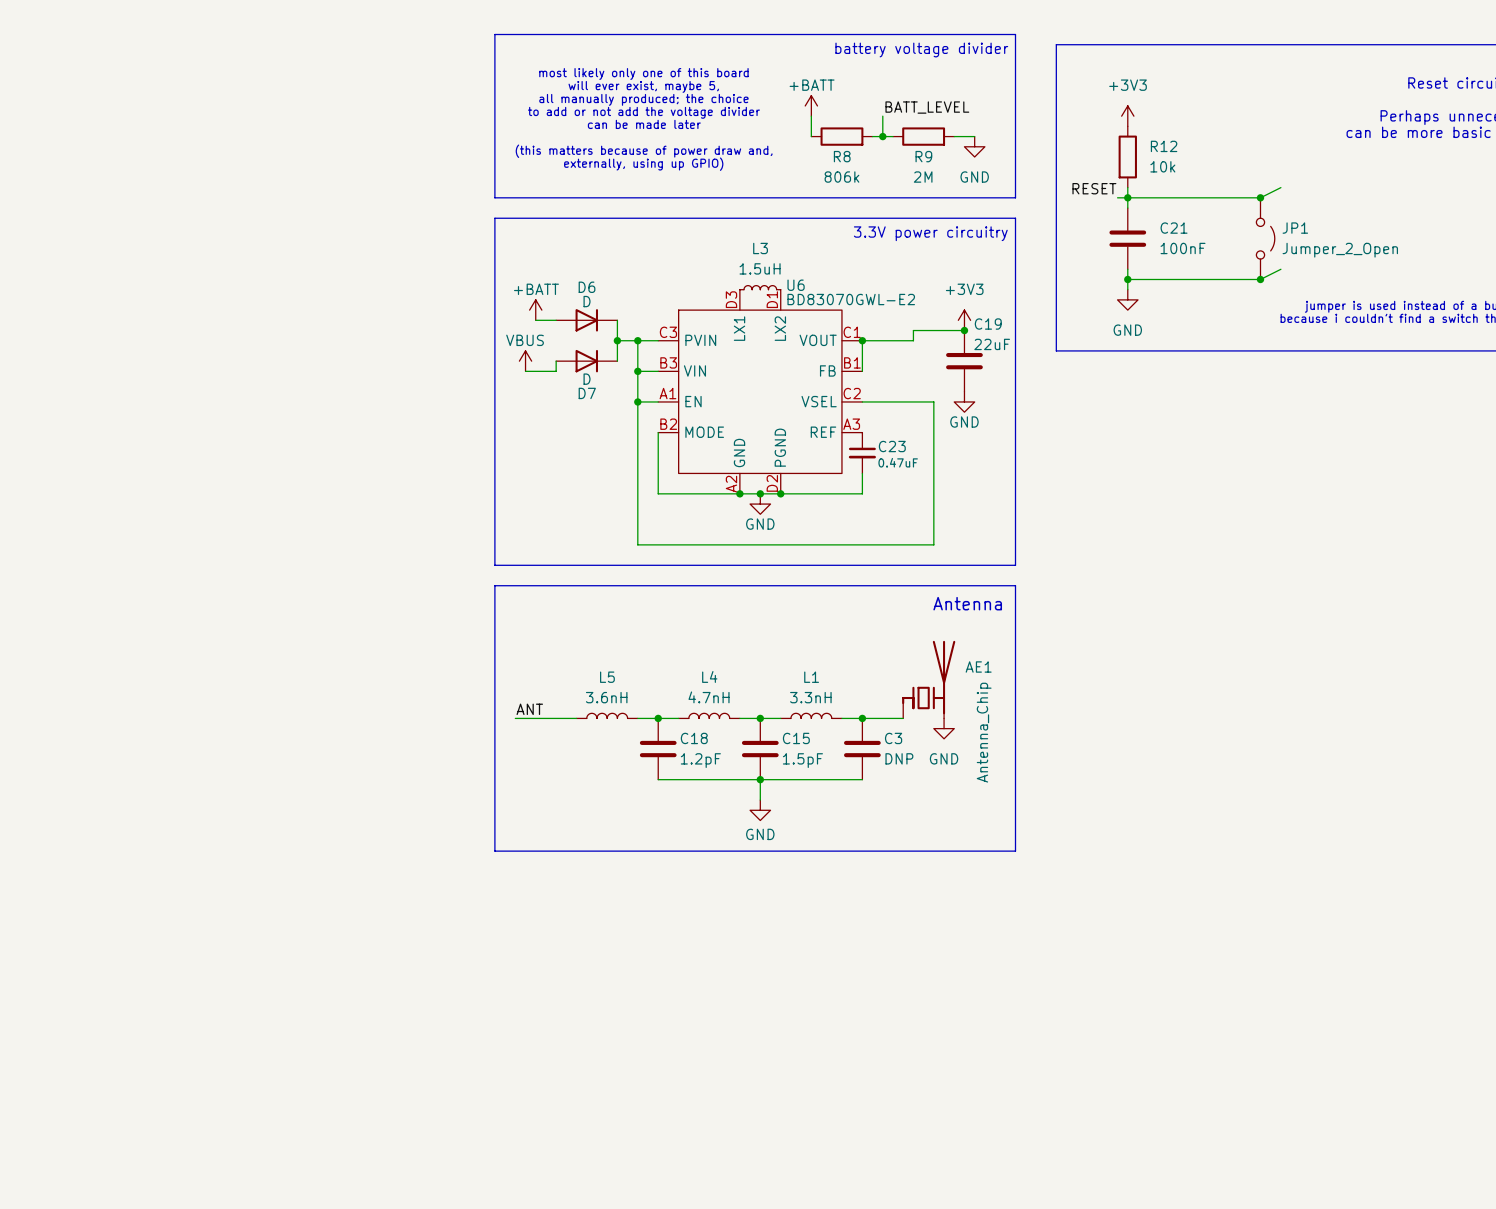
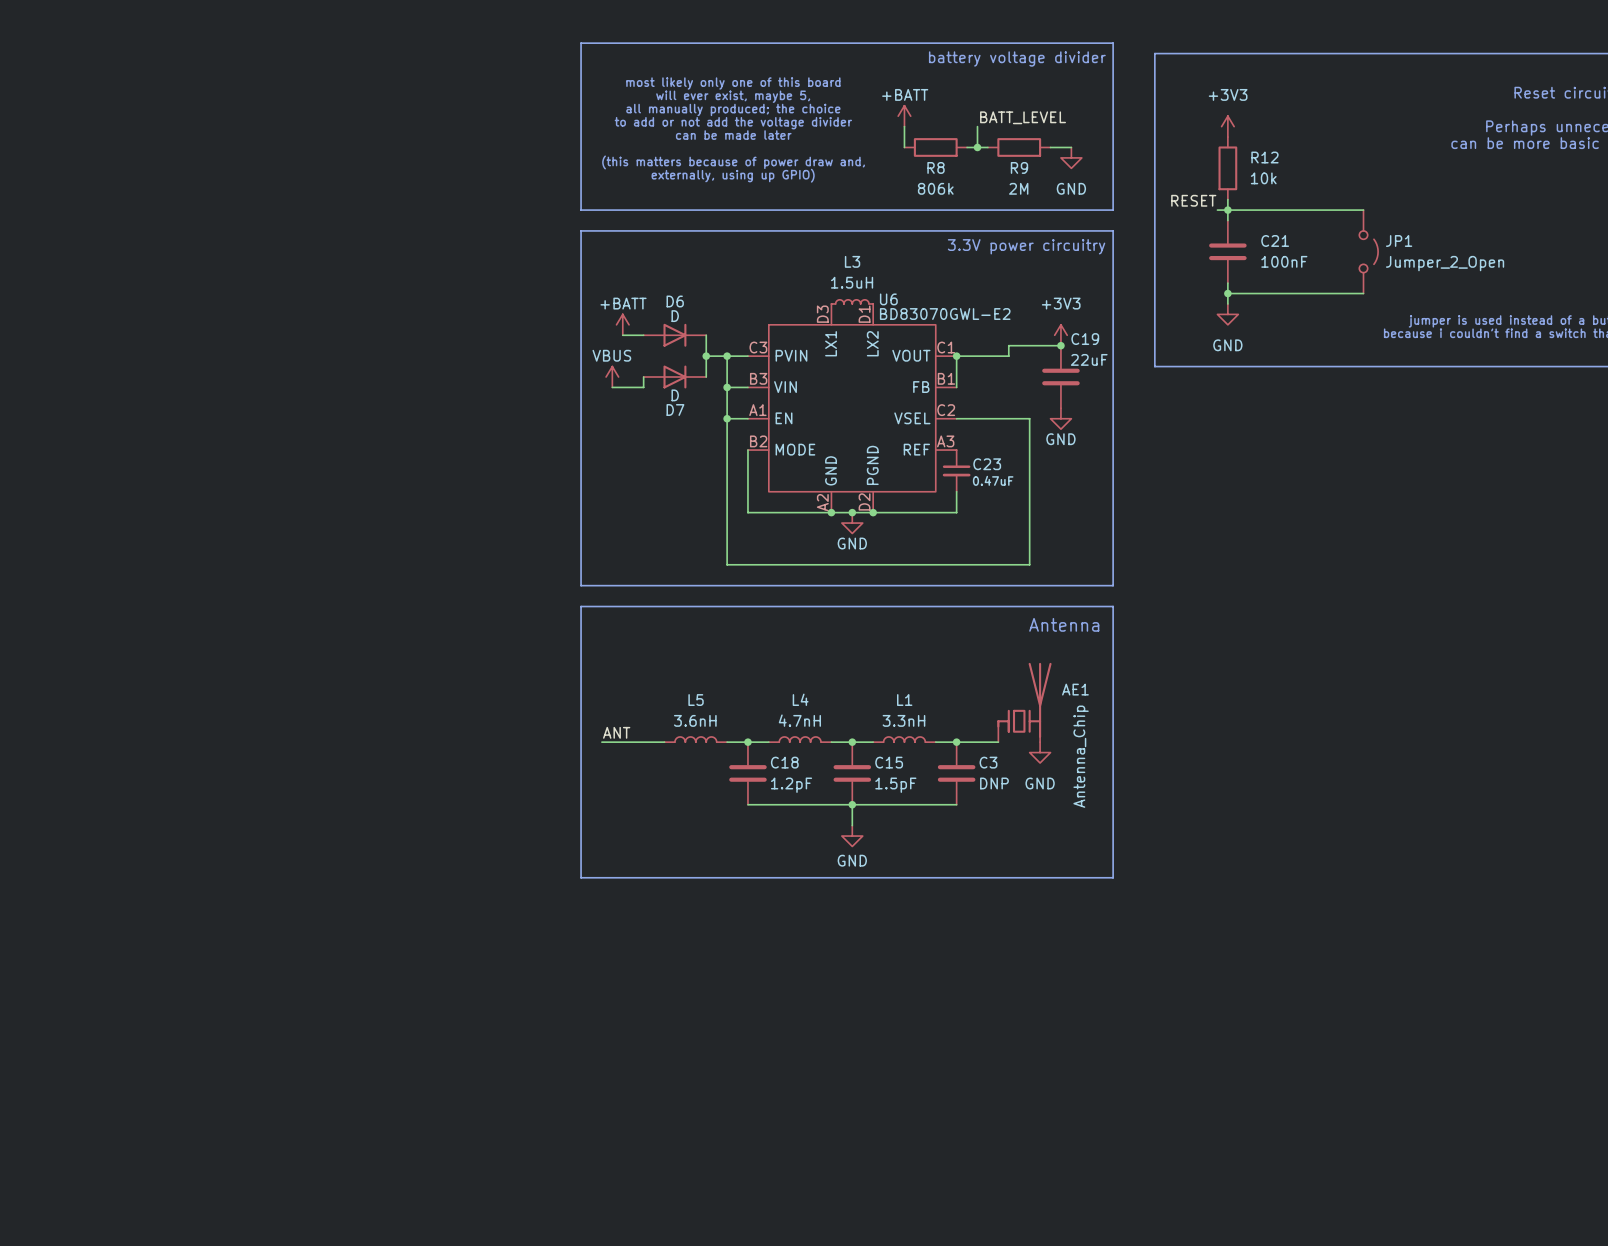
wire: (1280, 187) (1260, 197) -> none
junction: (1260, 197) -> none
wire: (1280, 269) (1260, 279) -> none
junction: (1260, 279) -> none

